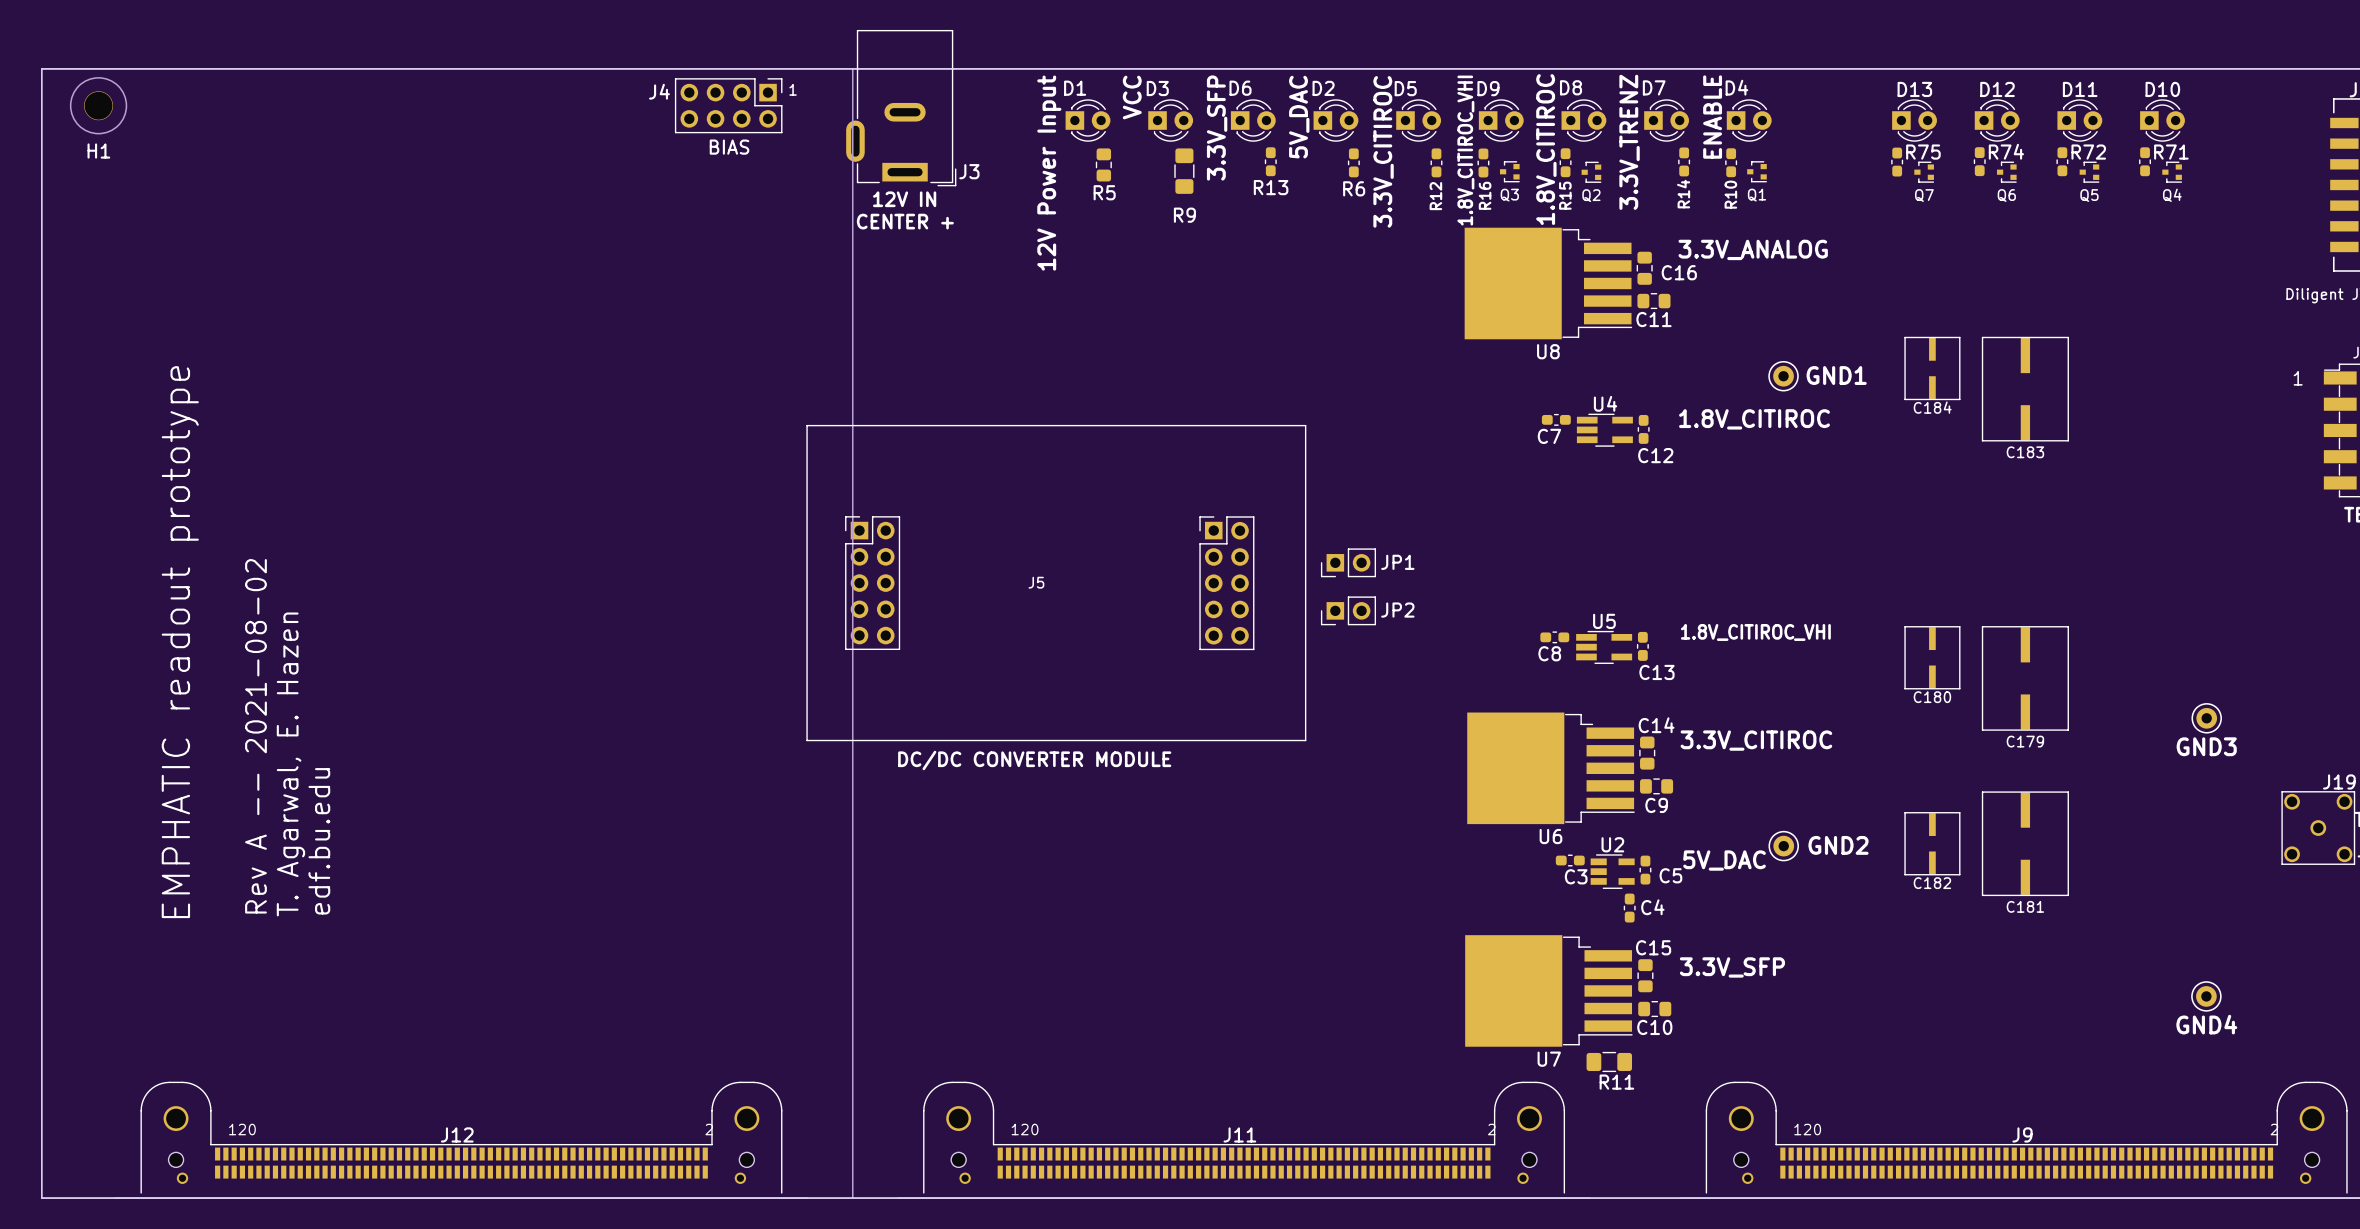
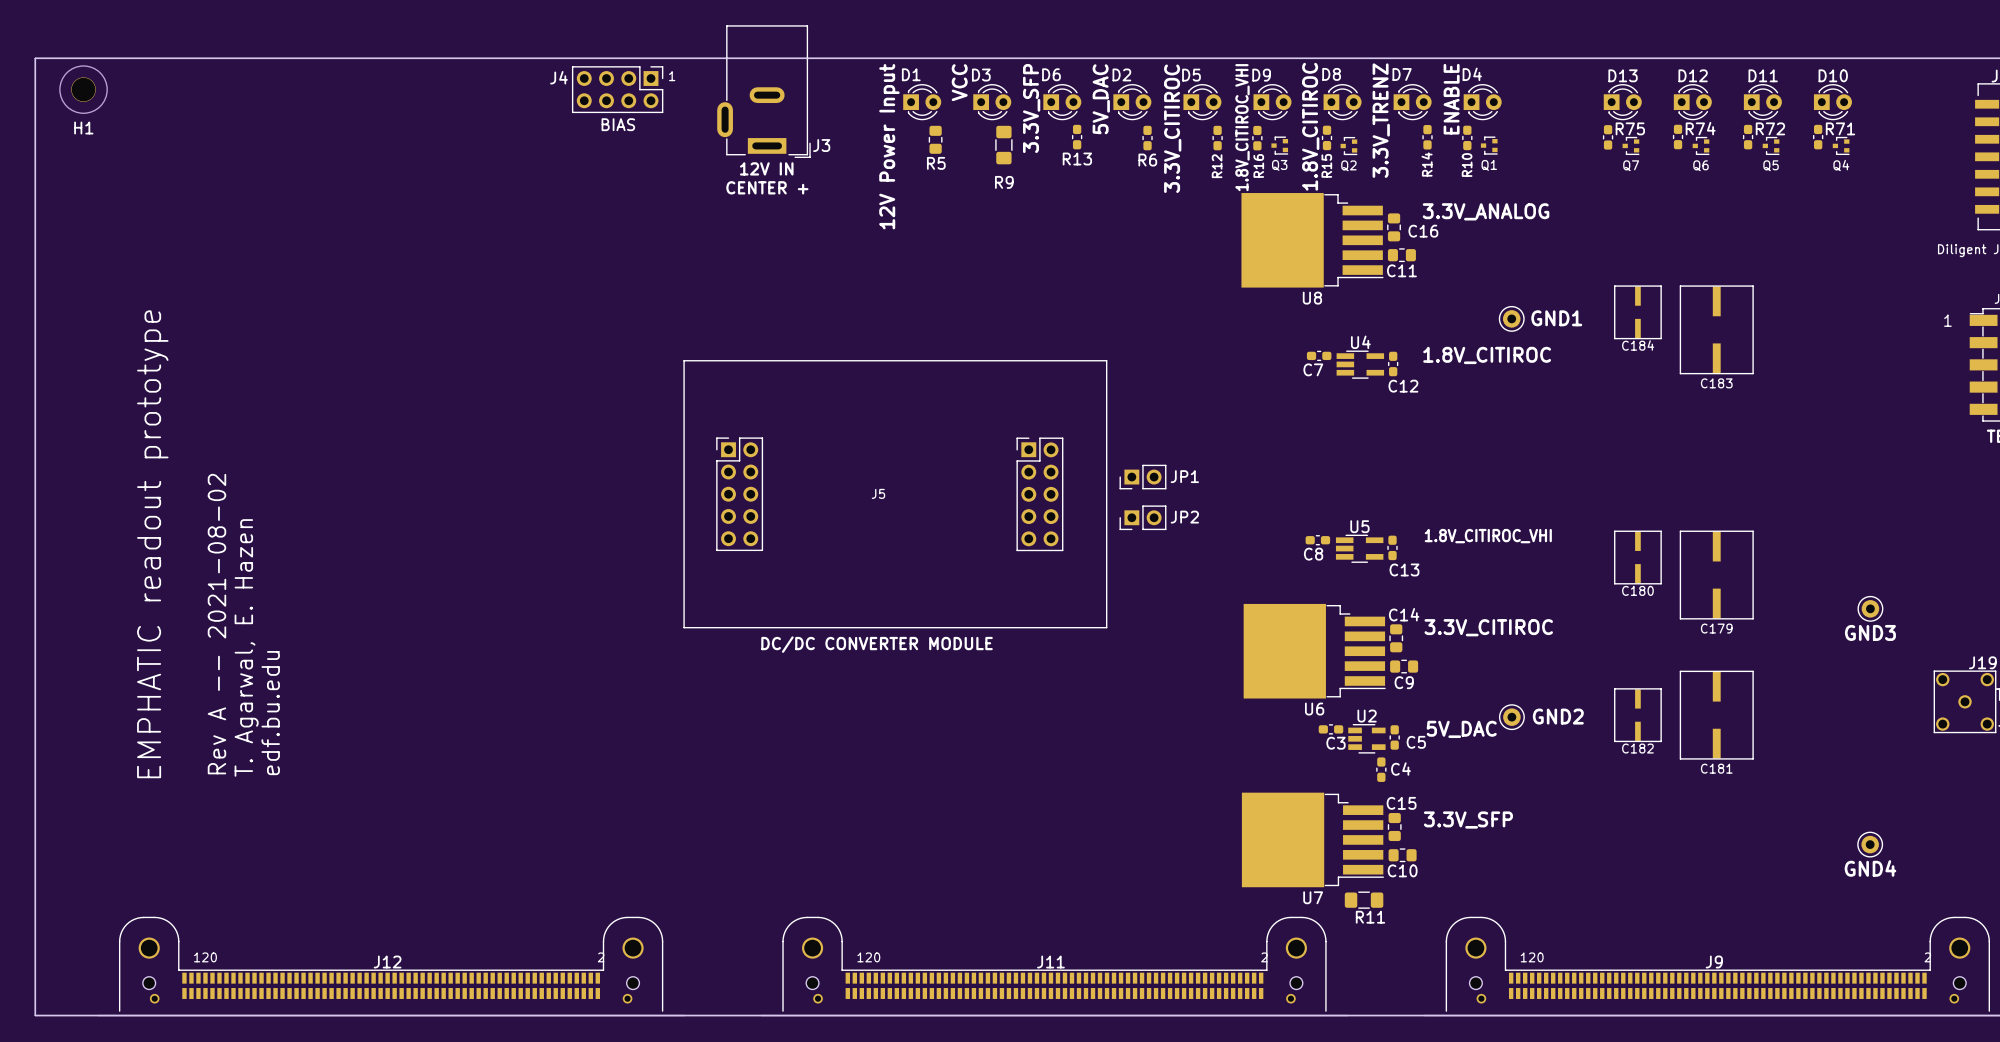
line: (852, 68) (852, 1198) -> none

